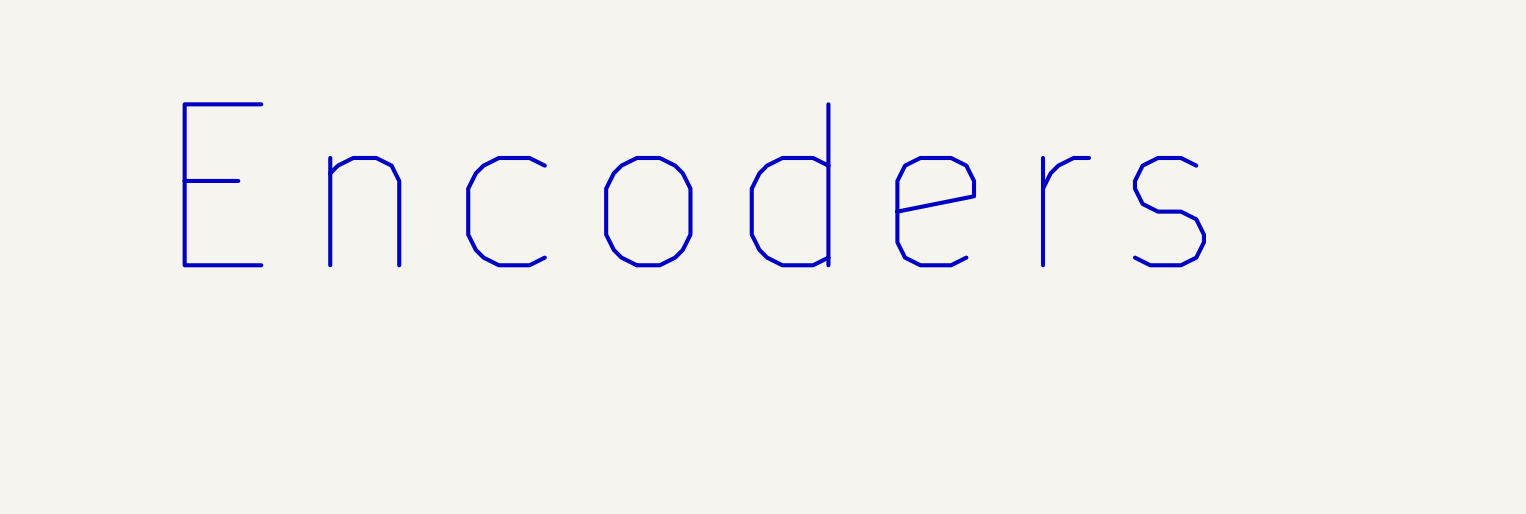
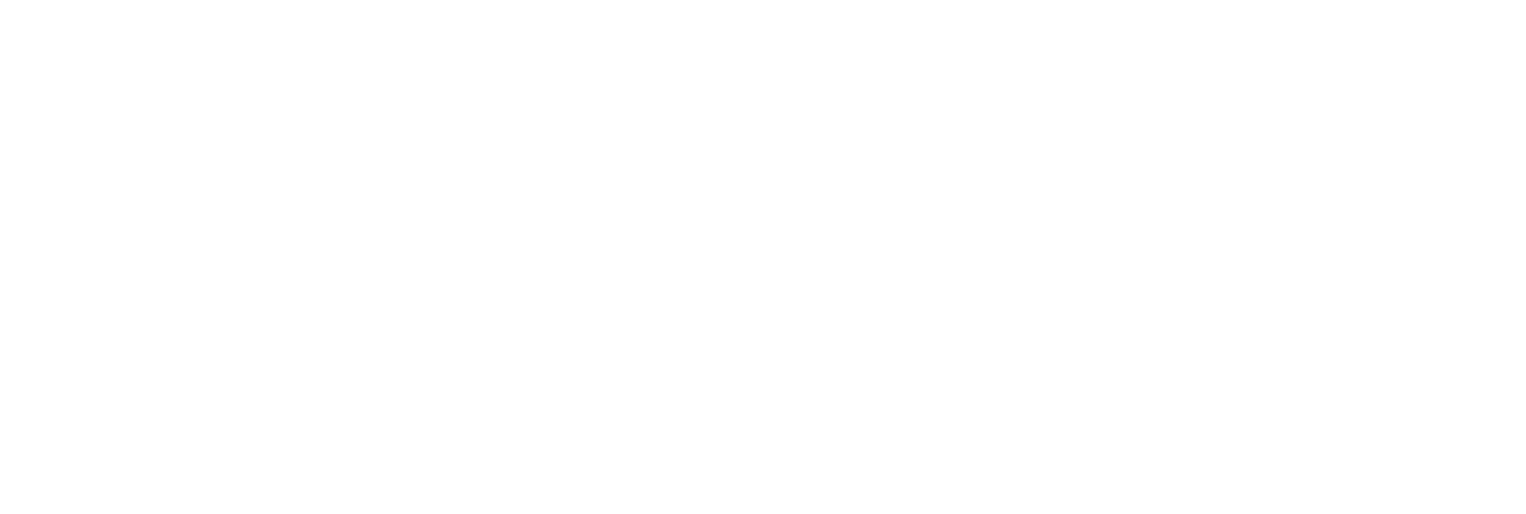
text: Encoders (694, 184) -> none

